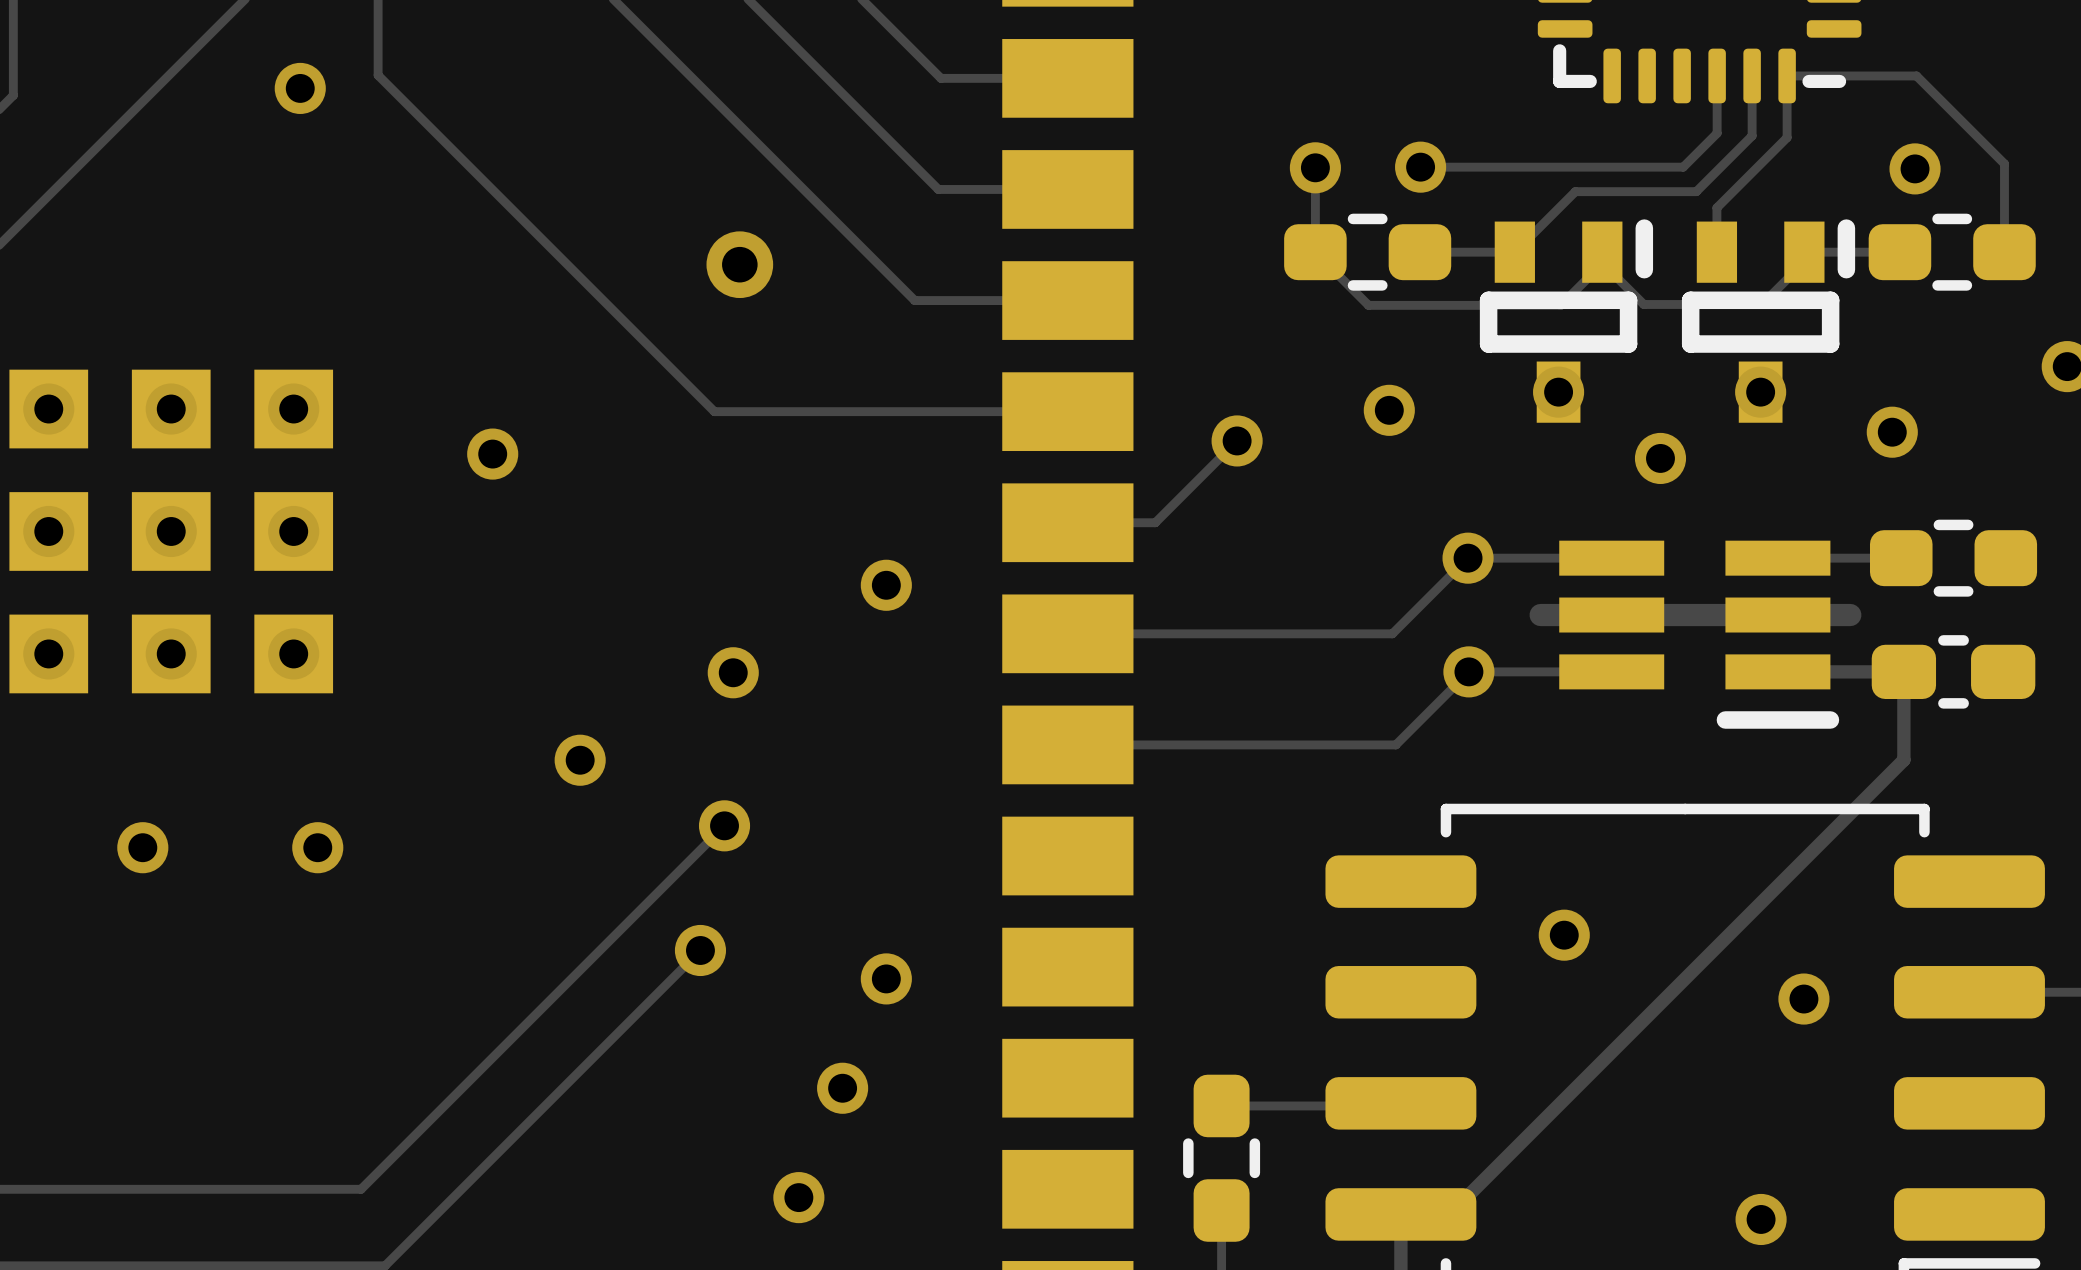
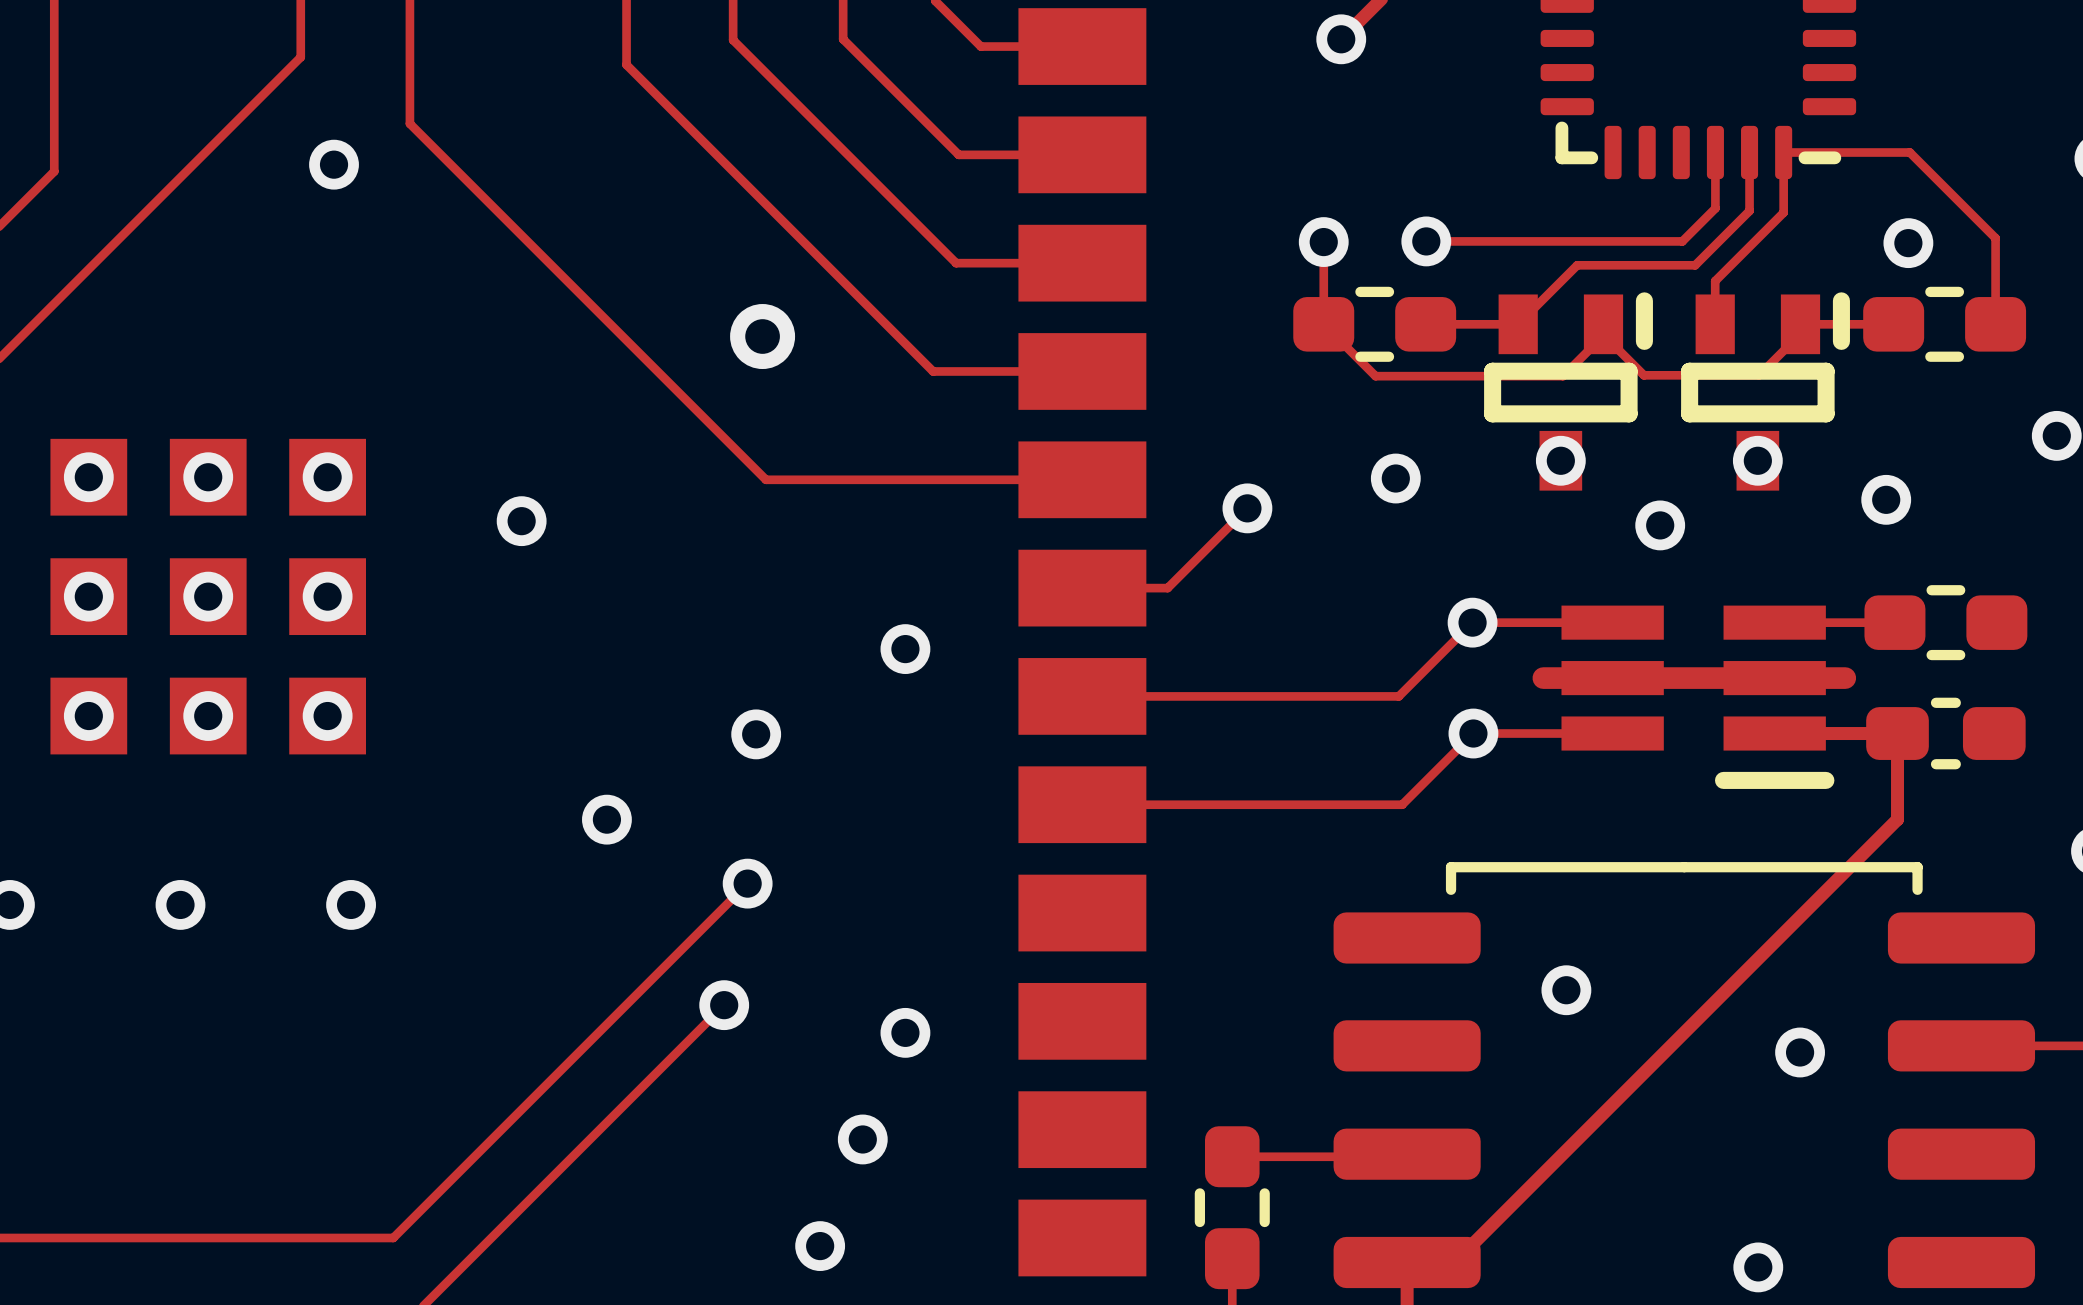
track: (378, 46) (378, 75) (714, 411) (743, 411) -> (409, 123) (765, 479)

